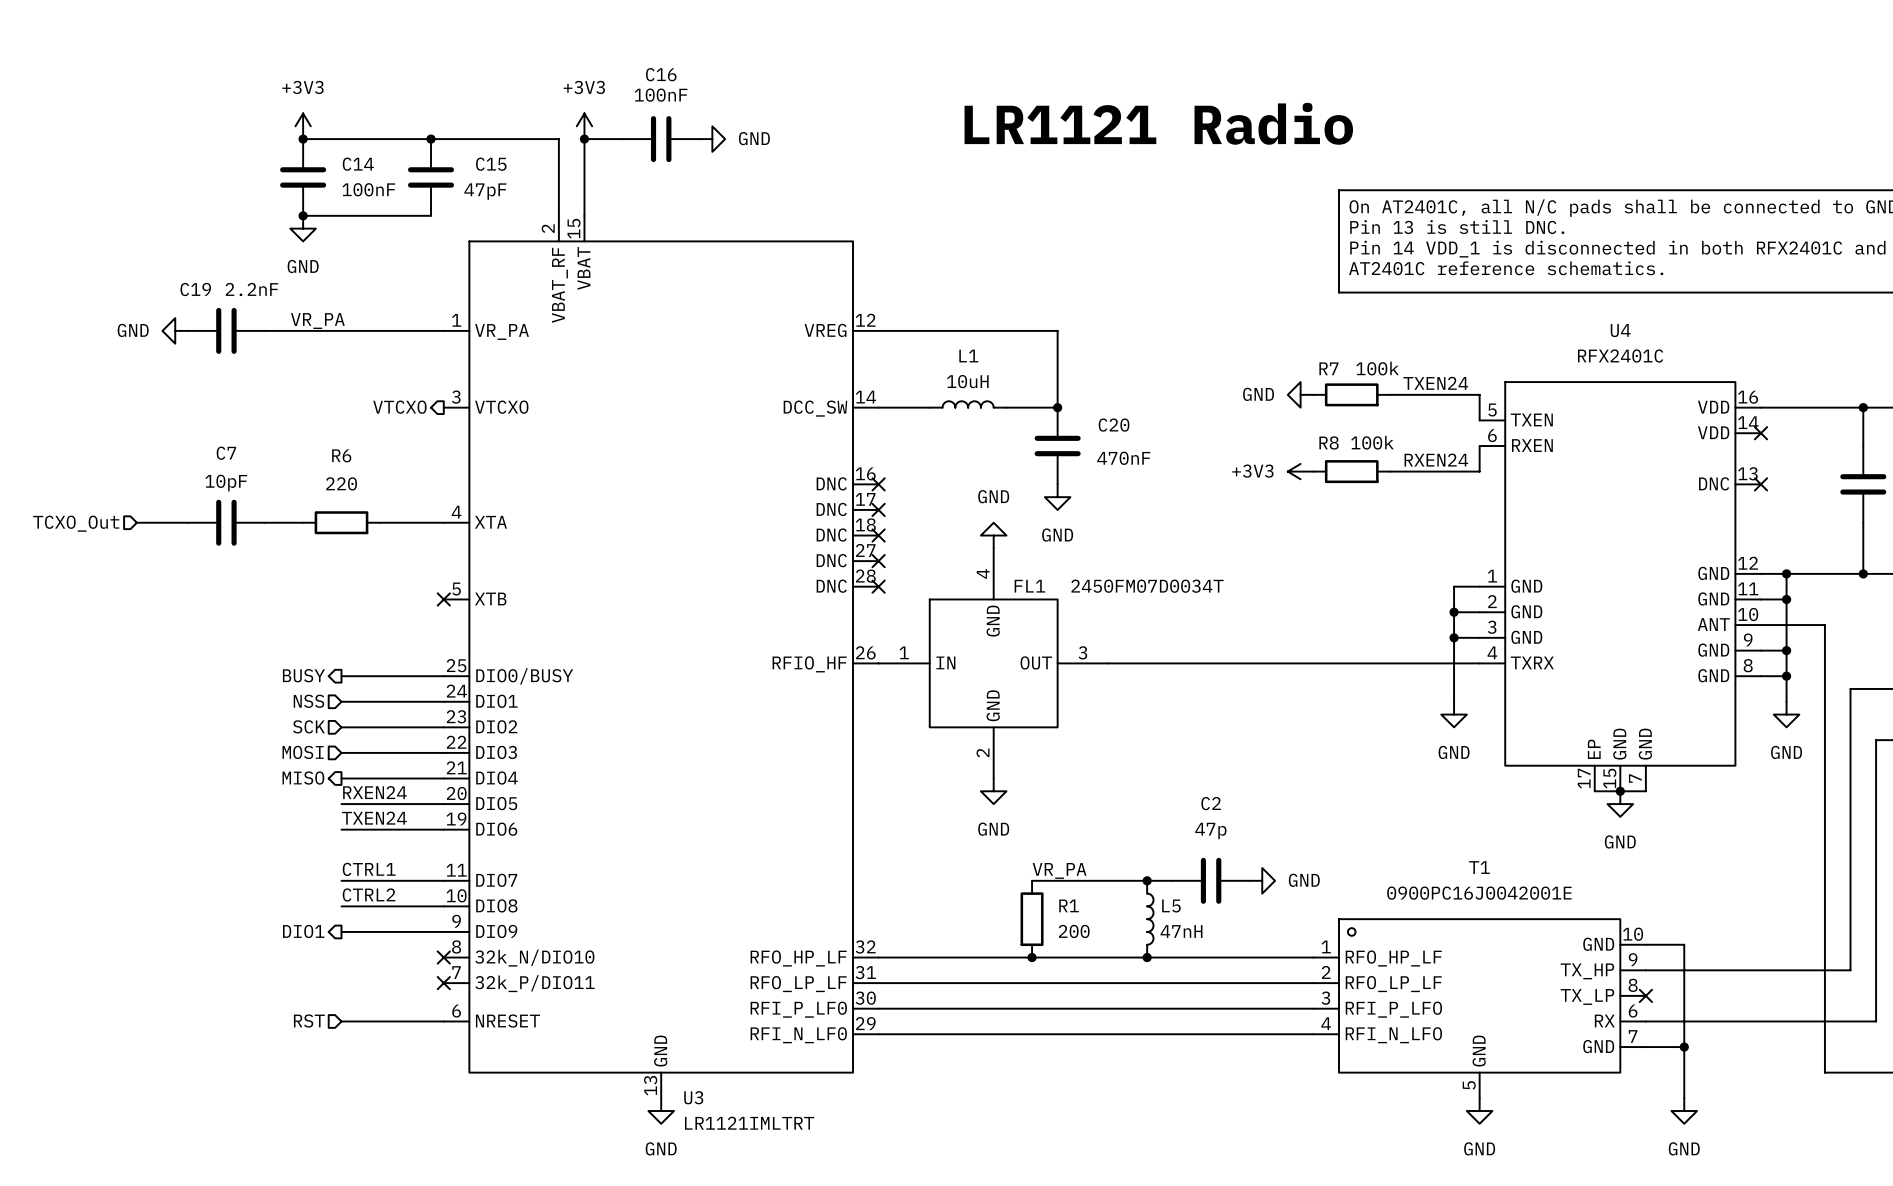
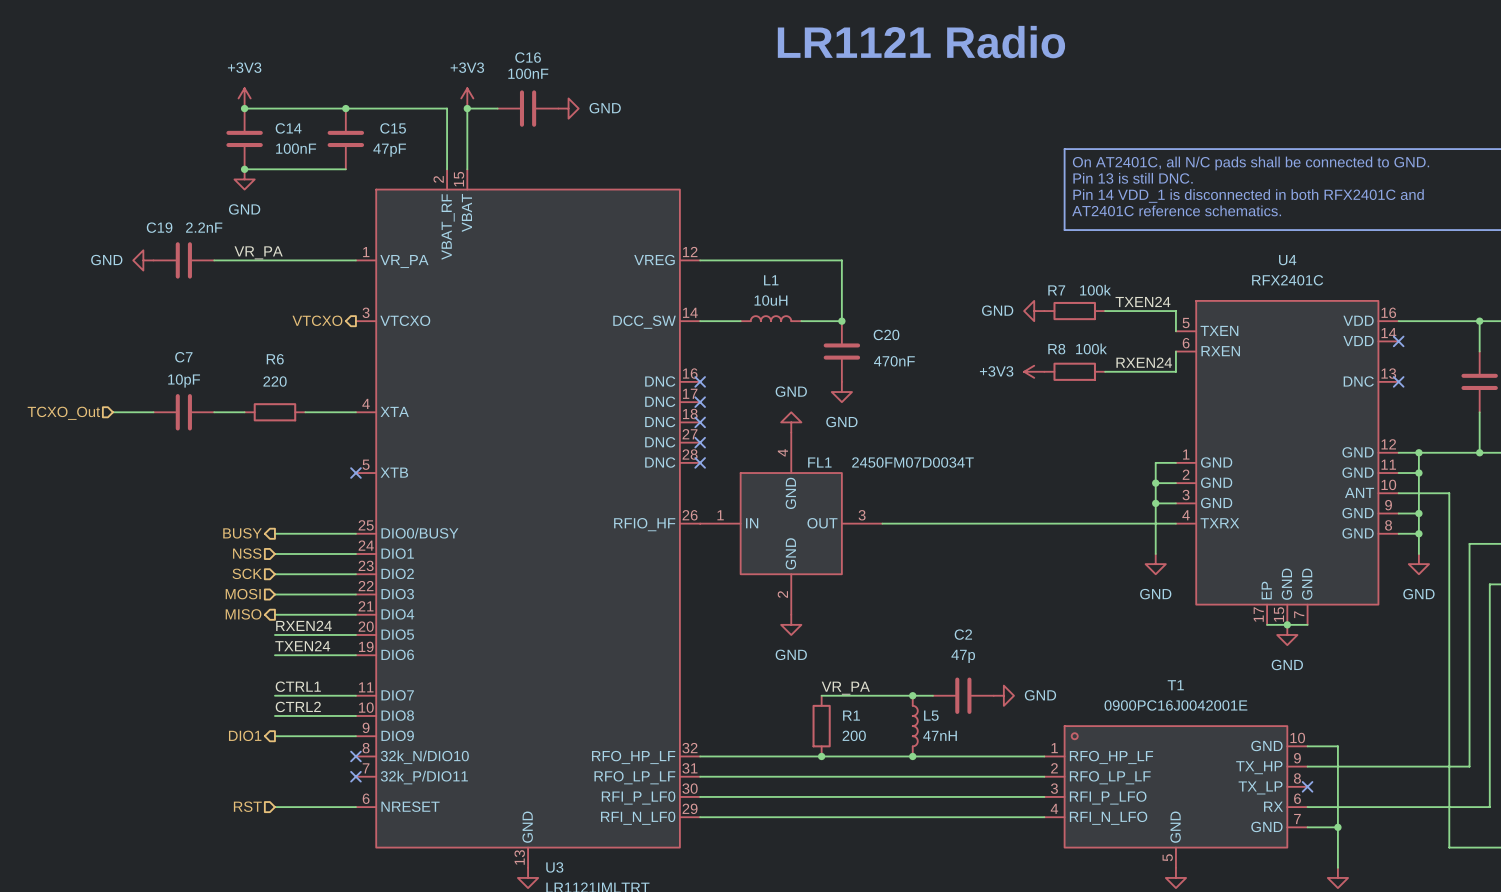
text position: LR1121 Radio (1158, 123) -> LR1121 Radio (921, 42)

